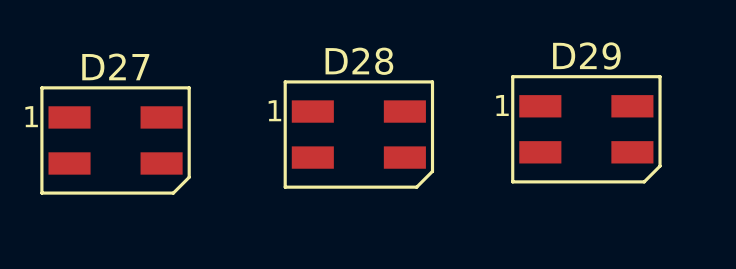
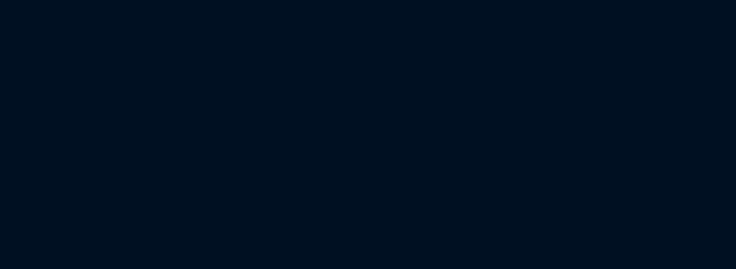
D29: (586, 129) -> none
D28: (358, 134) -> none
D27: (115, 140) -> none

